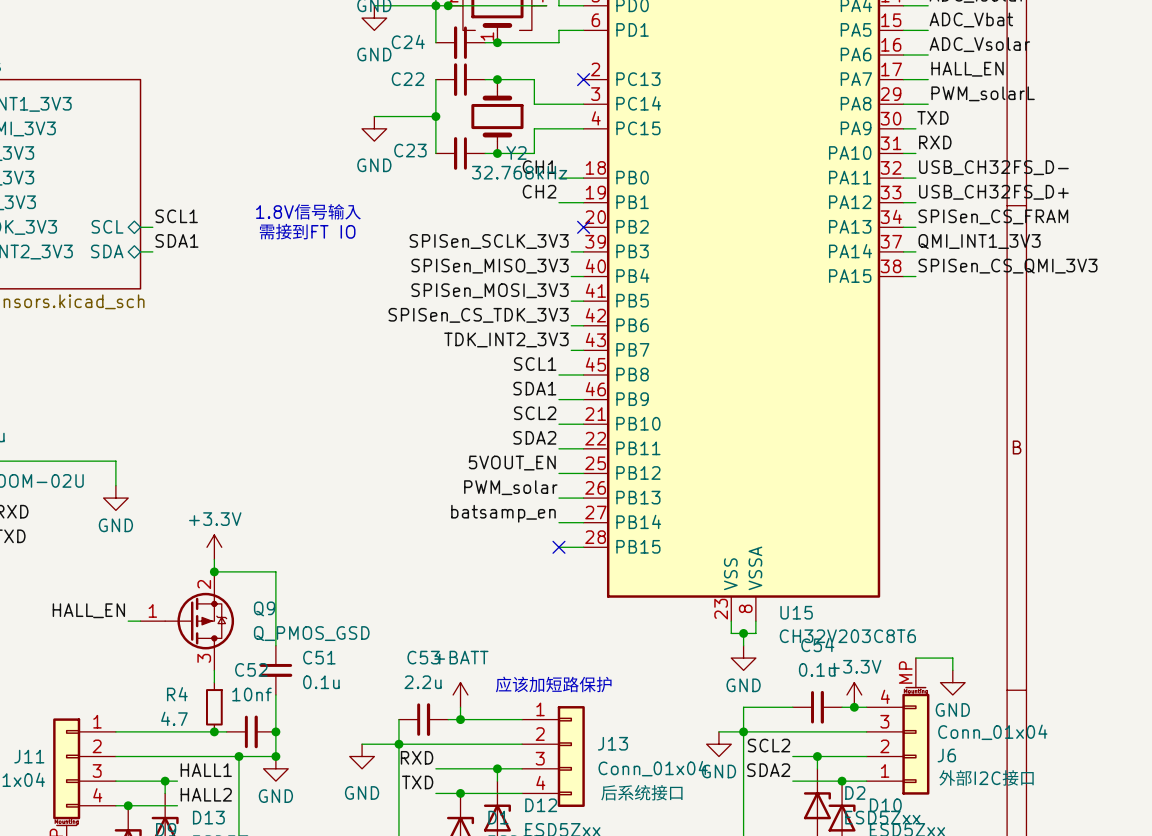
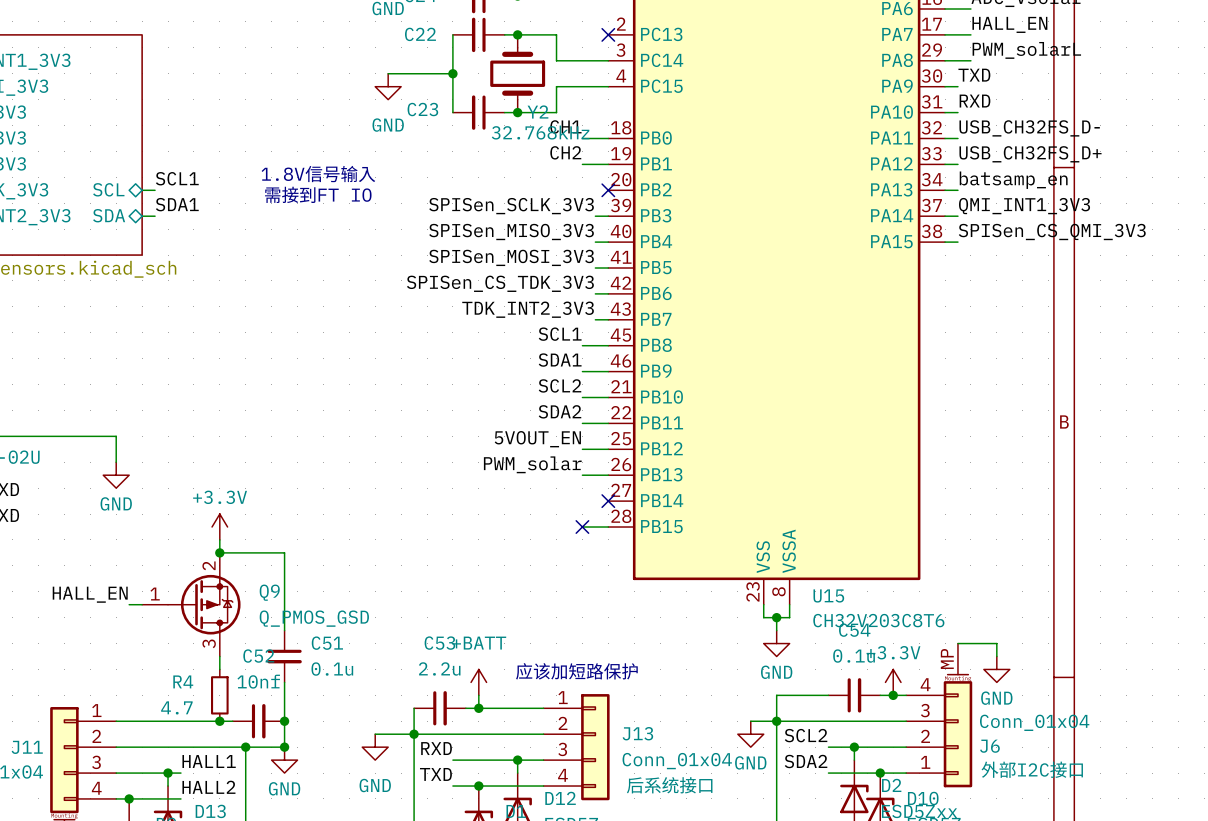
label: SPISen_CS_FRAM (993, 216) -> batsamp_en (1013, 180)
label: batsamp_en (503, 513) -> none
wire: (558, 522) (583, 522) -> none
no-connect mark: none -> (608, 501)

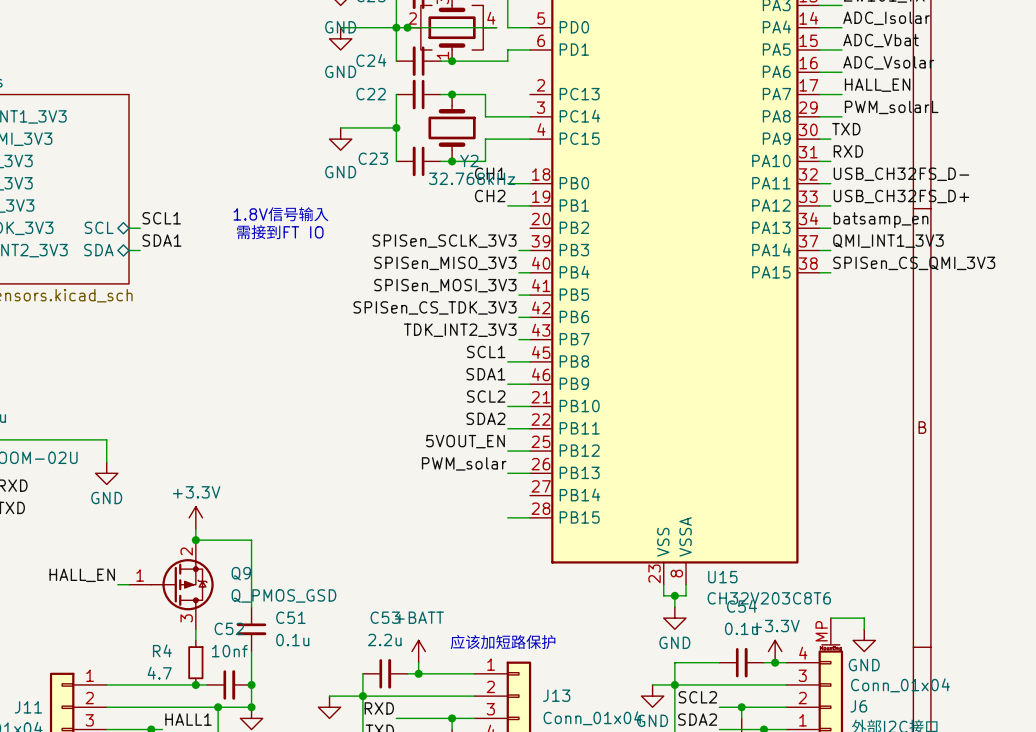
no-connect mark: (608, 34) -> none
no-connect mark: (608, 190) -> none
no-connect mark: (608, 501) -> none
no-connect mark: (582, 527) -> none

